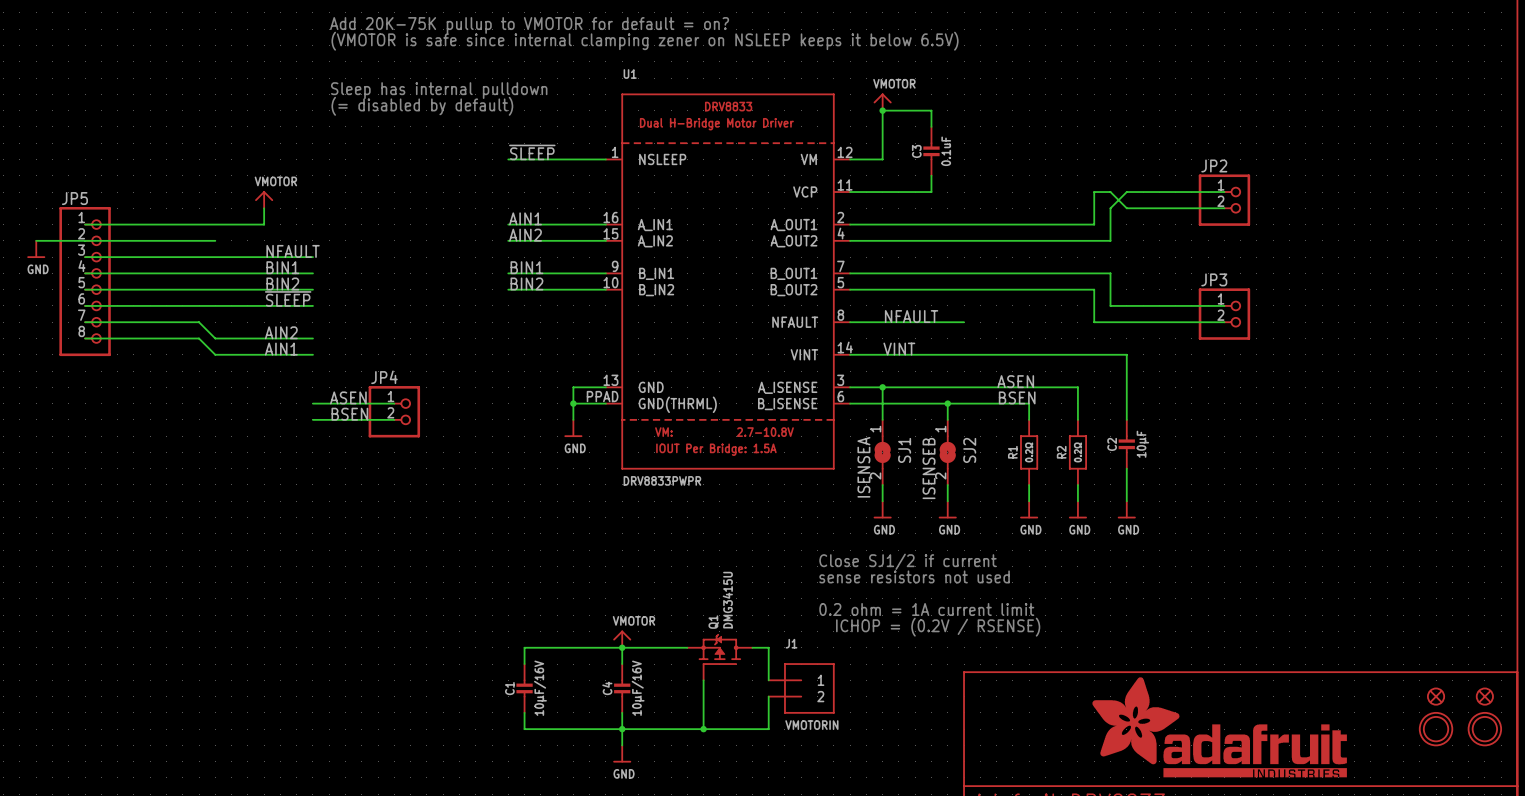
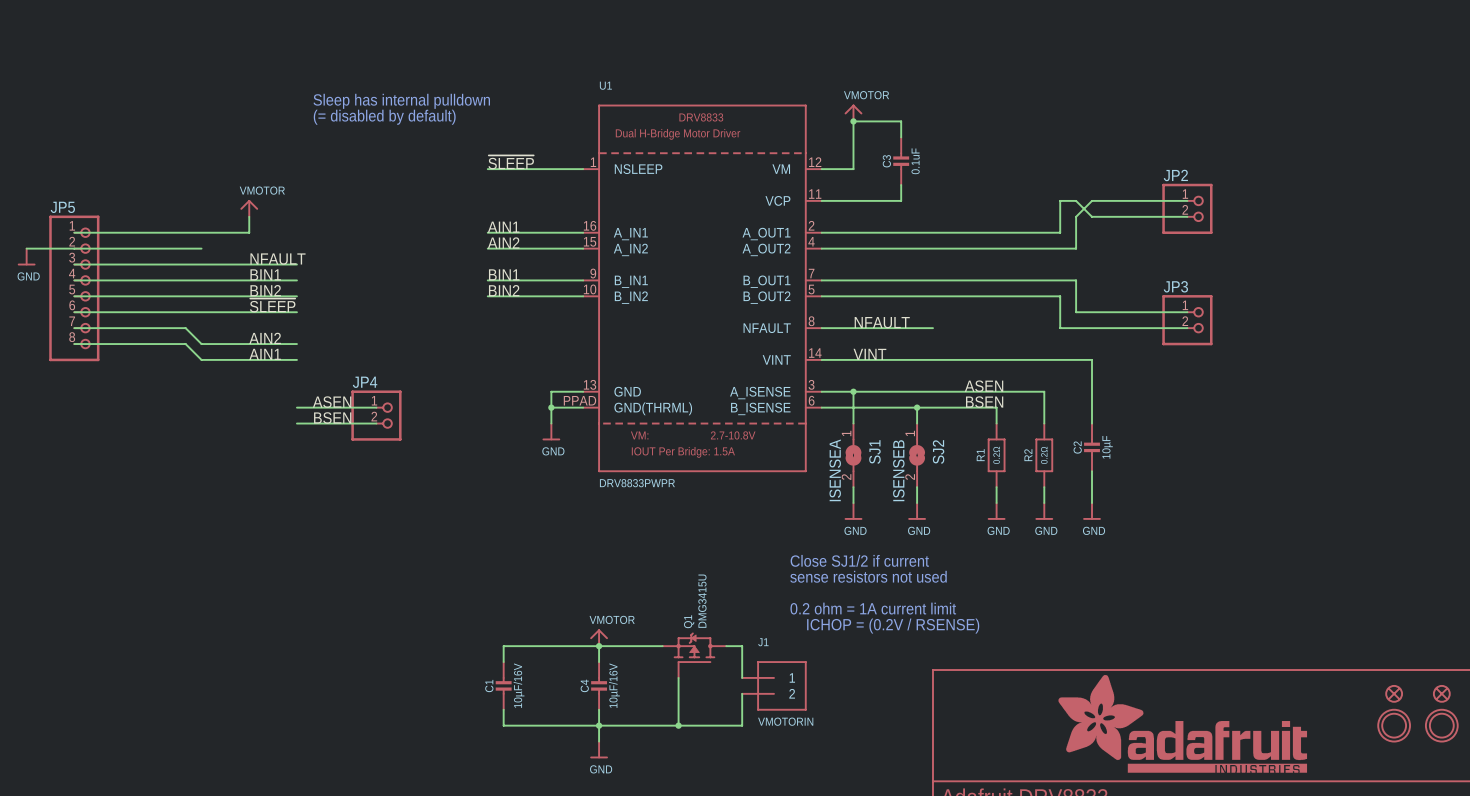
text: Add 20K-75K pullup to VMOTOR for default = on? (529, 25) -> none
text: (VMOTOR is safe since internal clamping zener on NSLEEP keeps it below 6.5V) (645, 41) -> none

